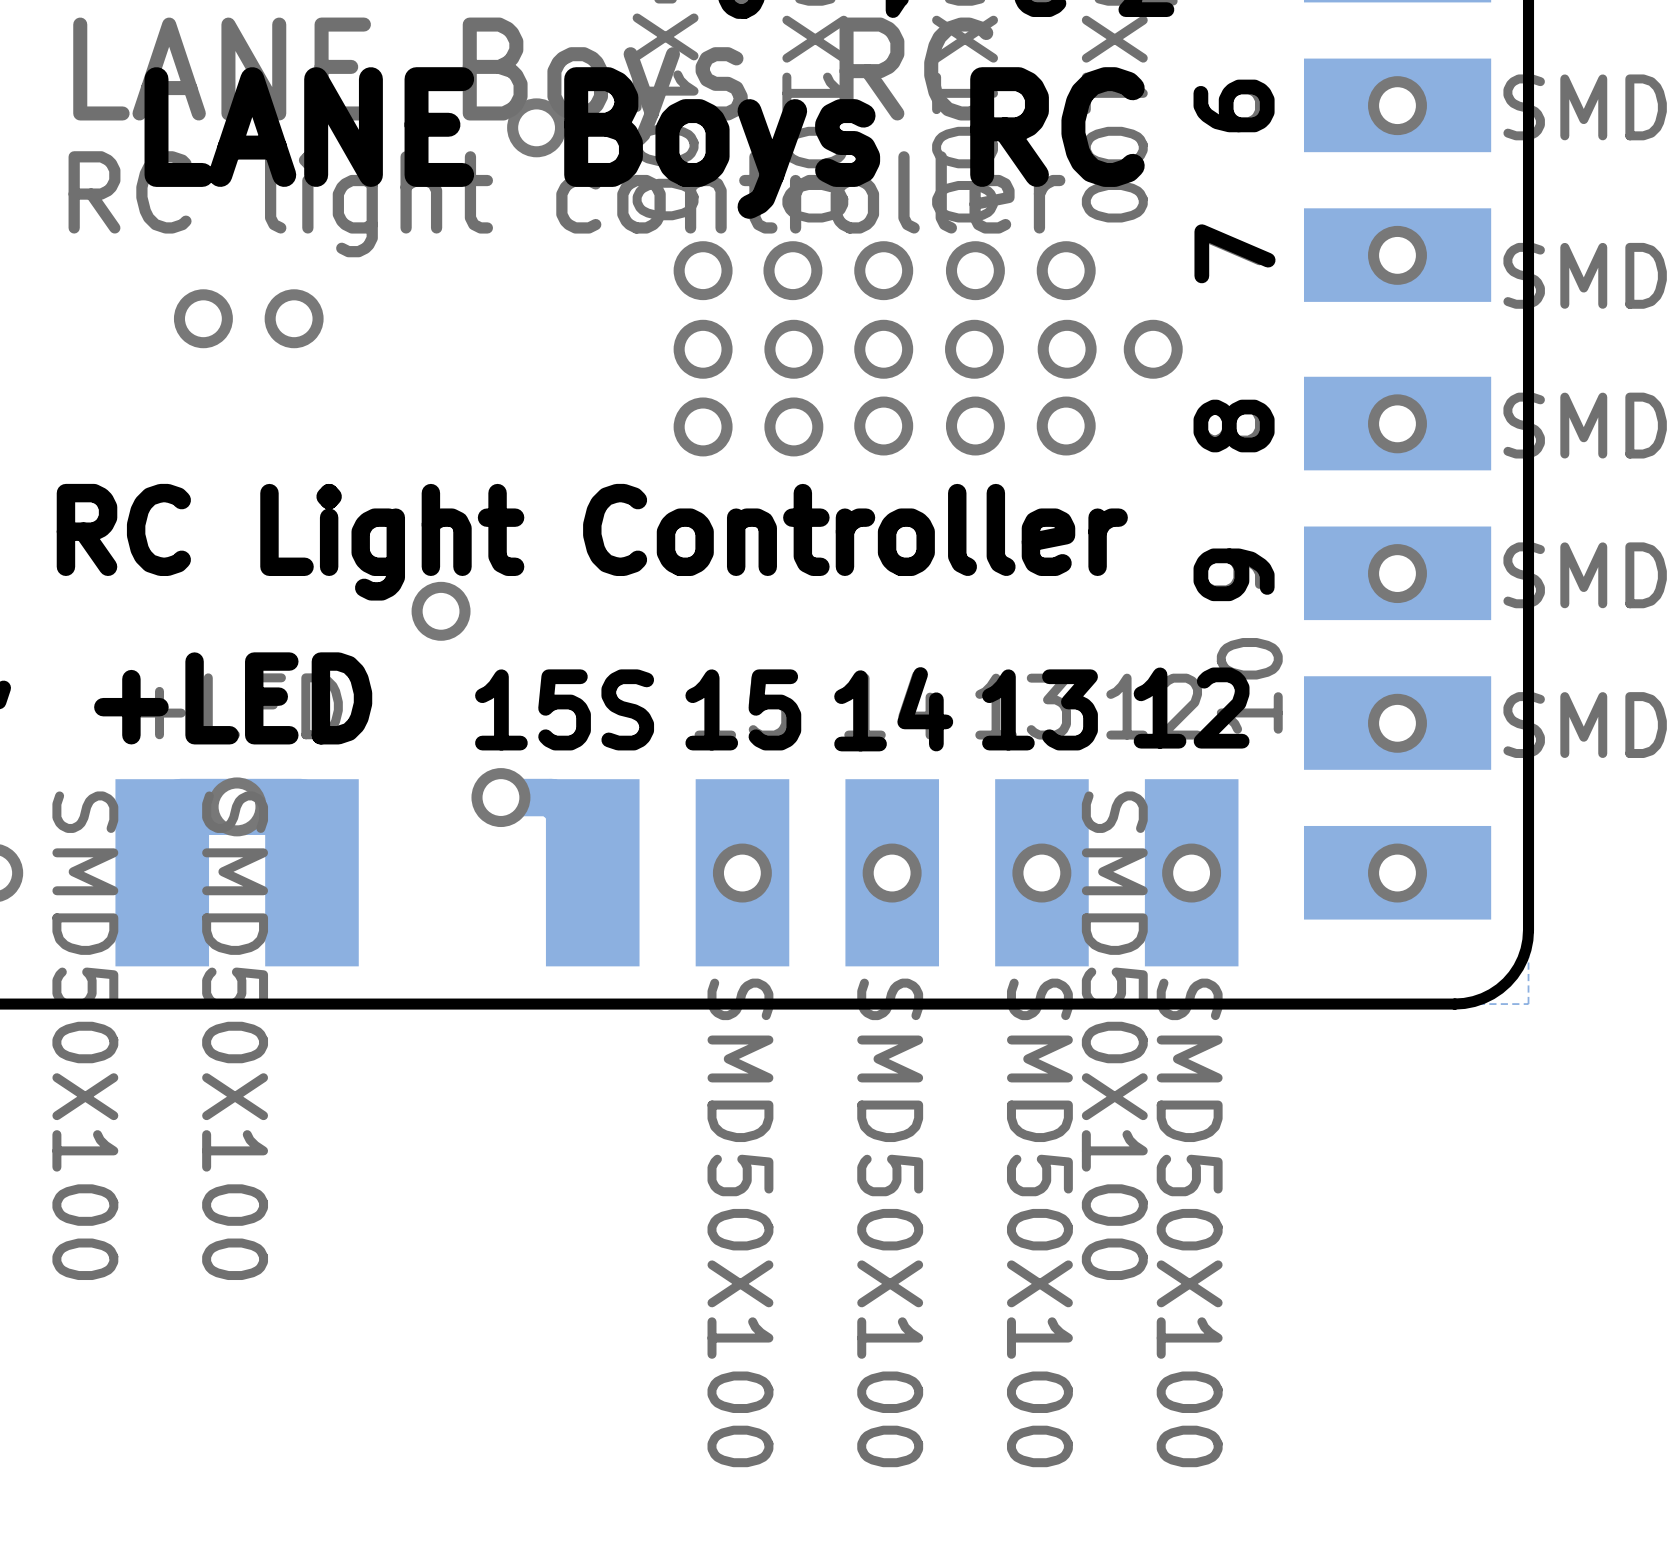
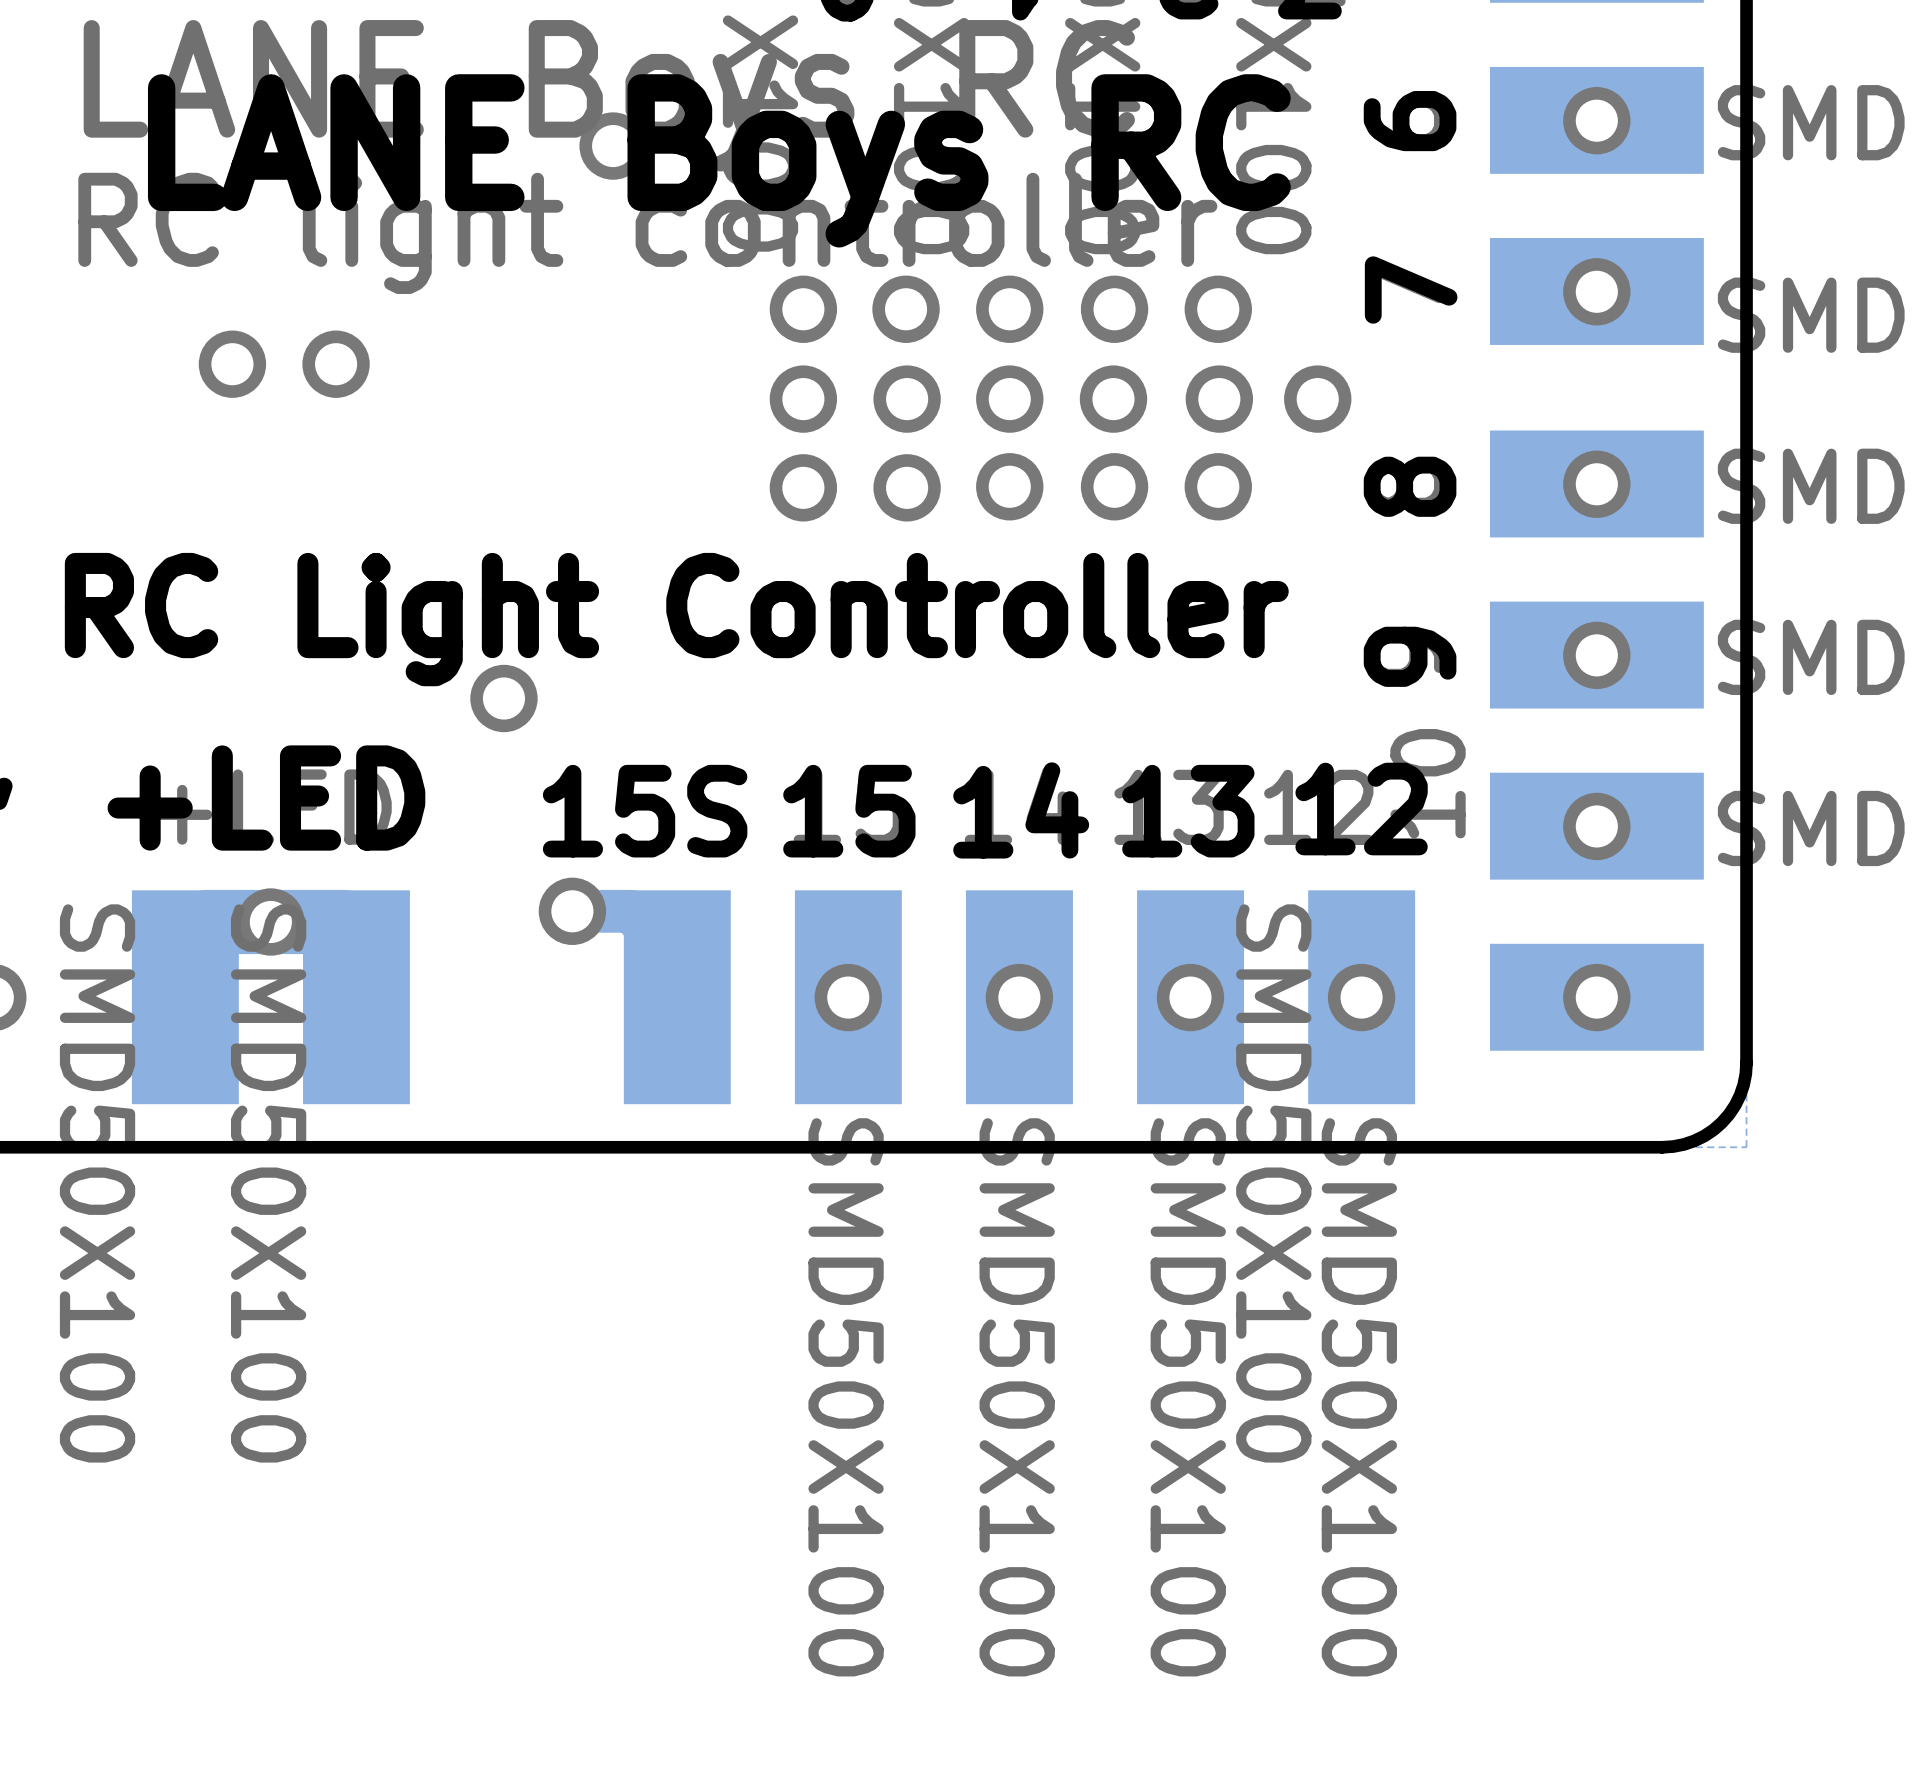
text position: LANE Boys RC (644, 143) -> LANE Boys RC (719, 160)

